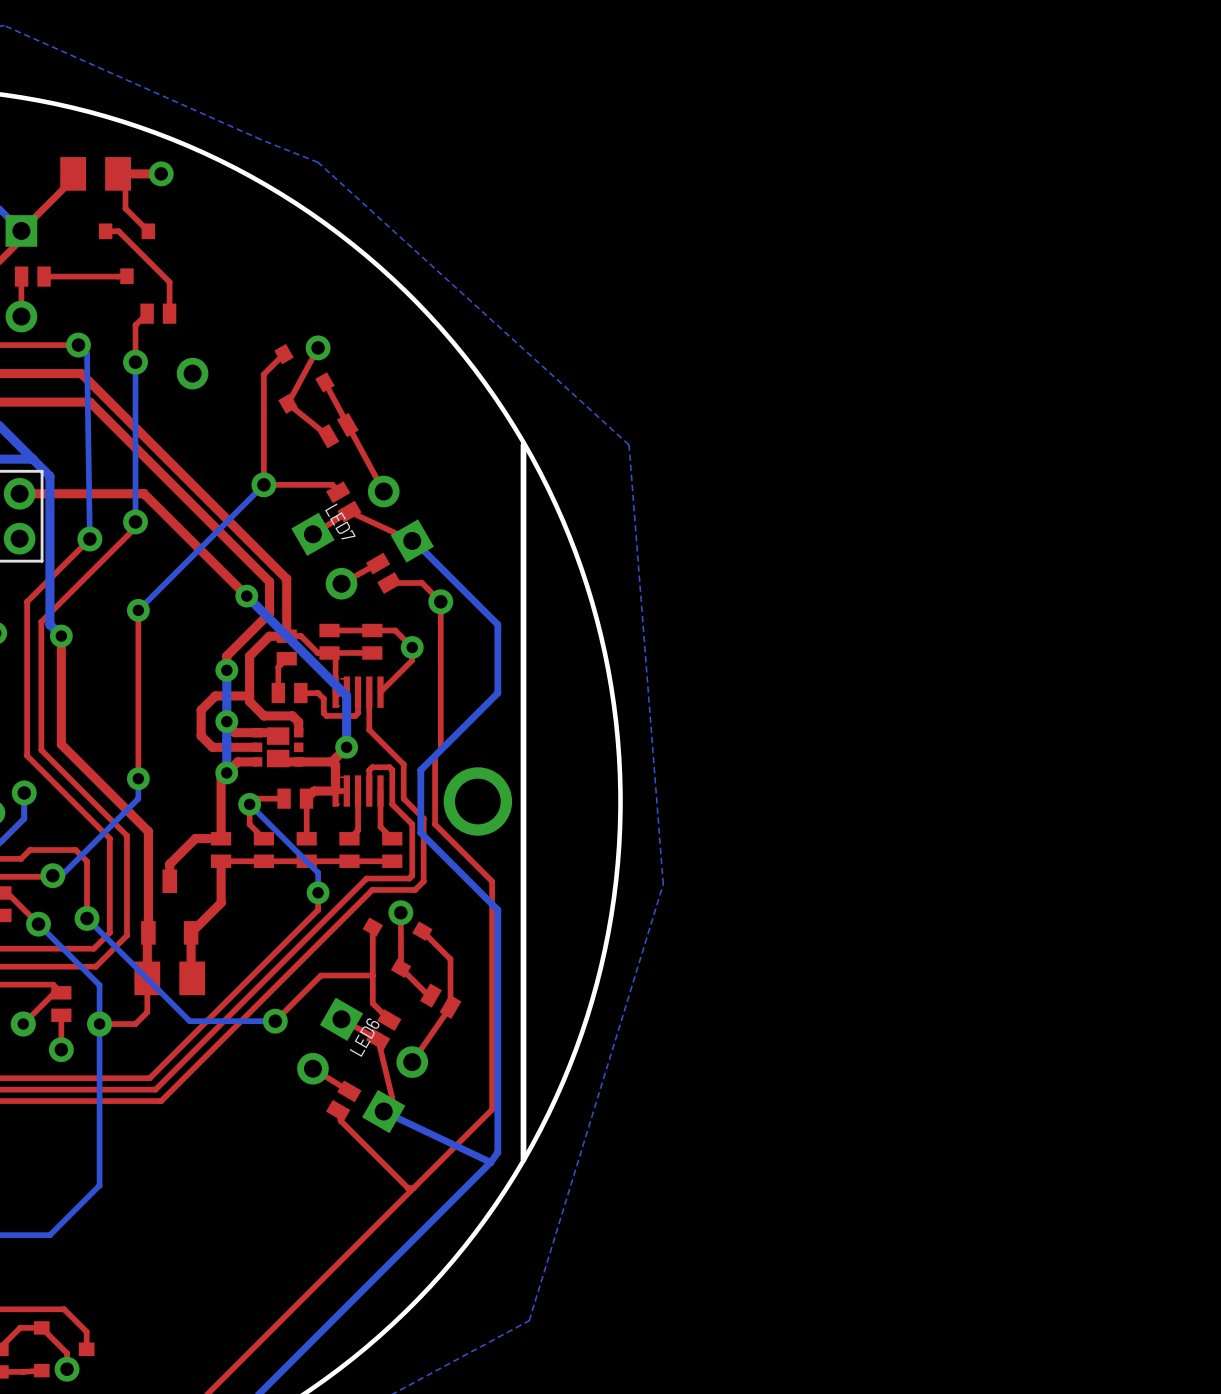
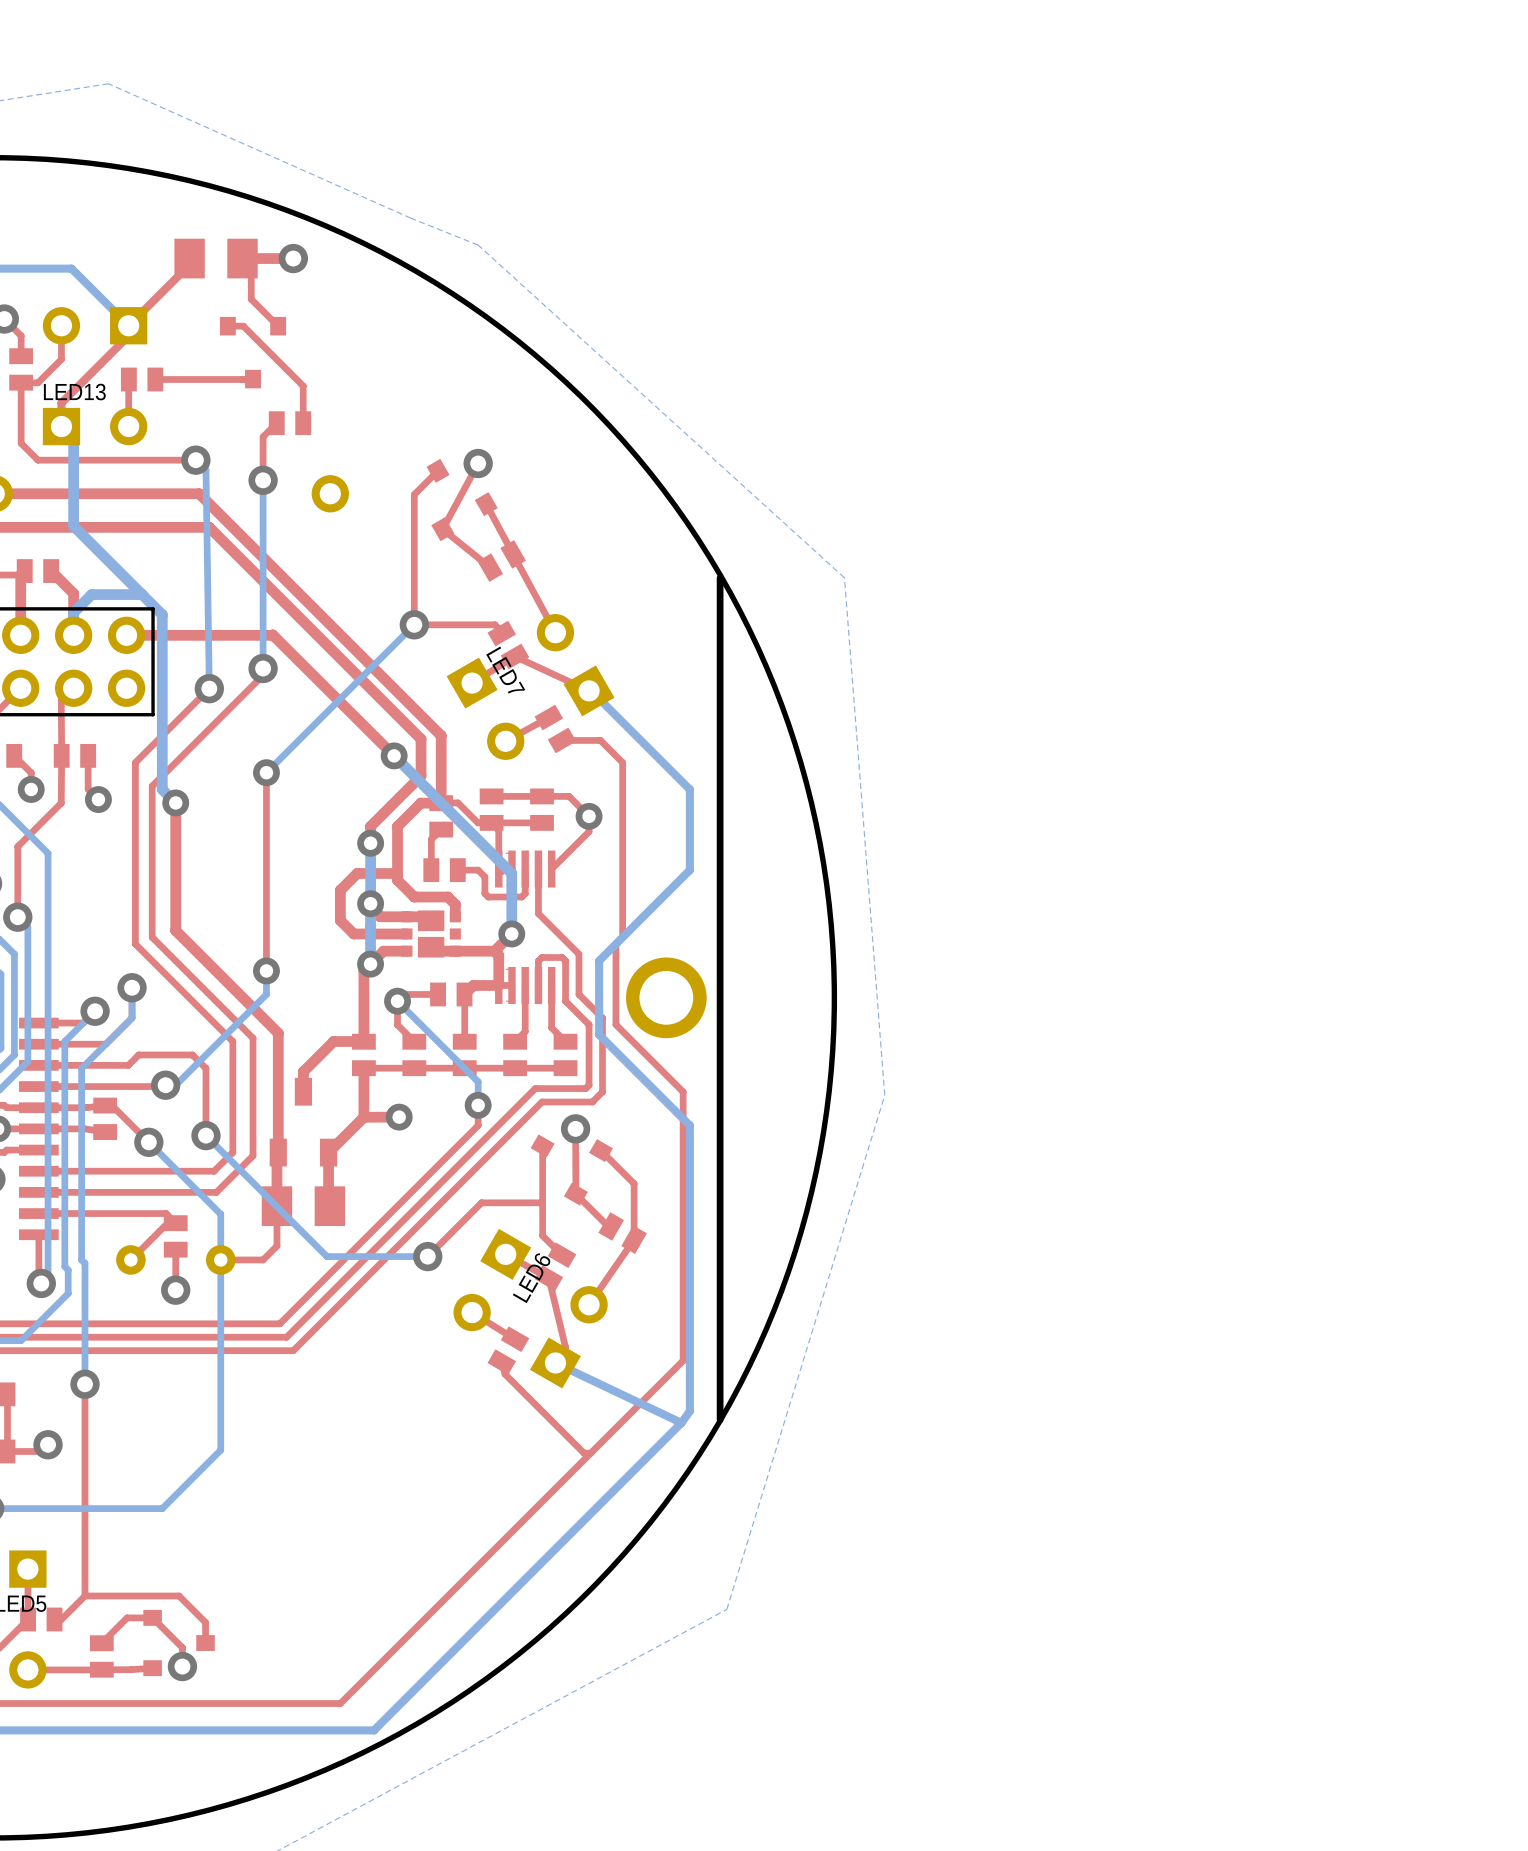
via: (440, 601) -> none
top track: none -> (399, 1117) (363, 1117)
via: none -> (399, 1117)

